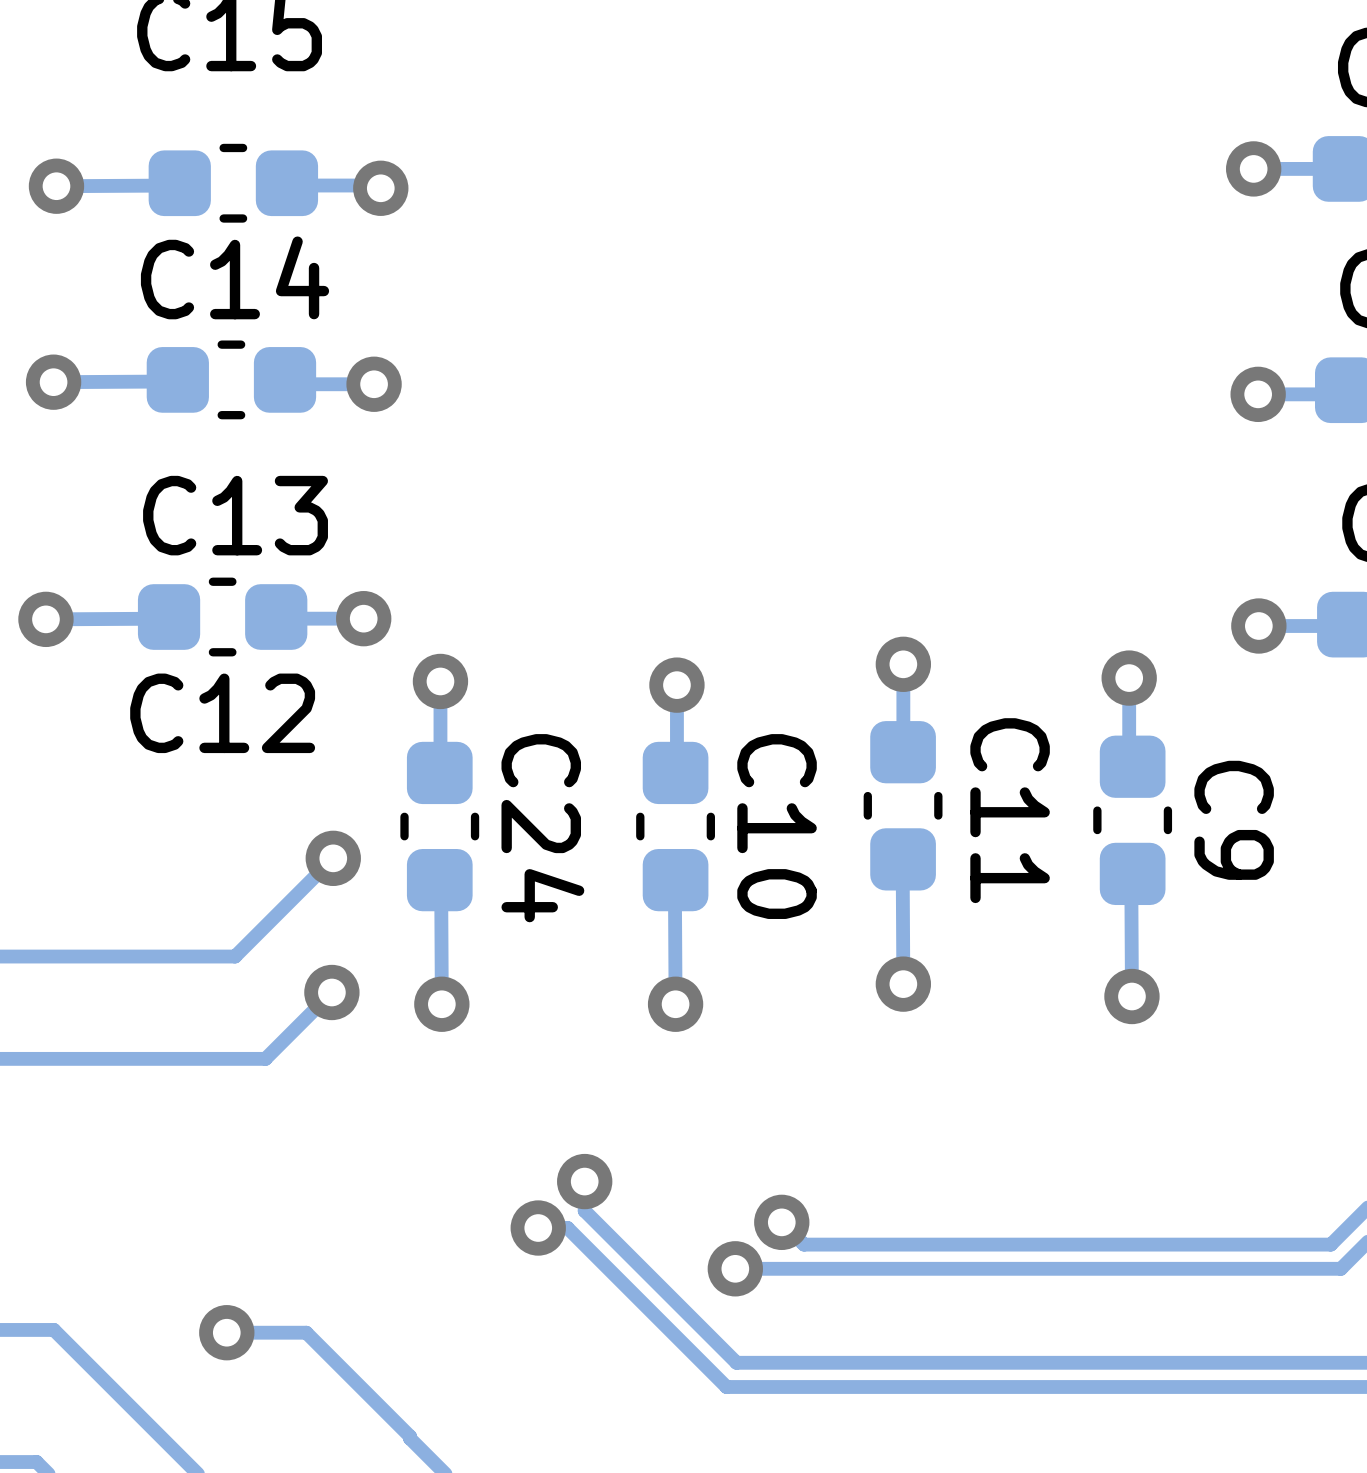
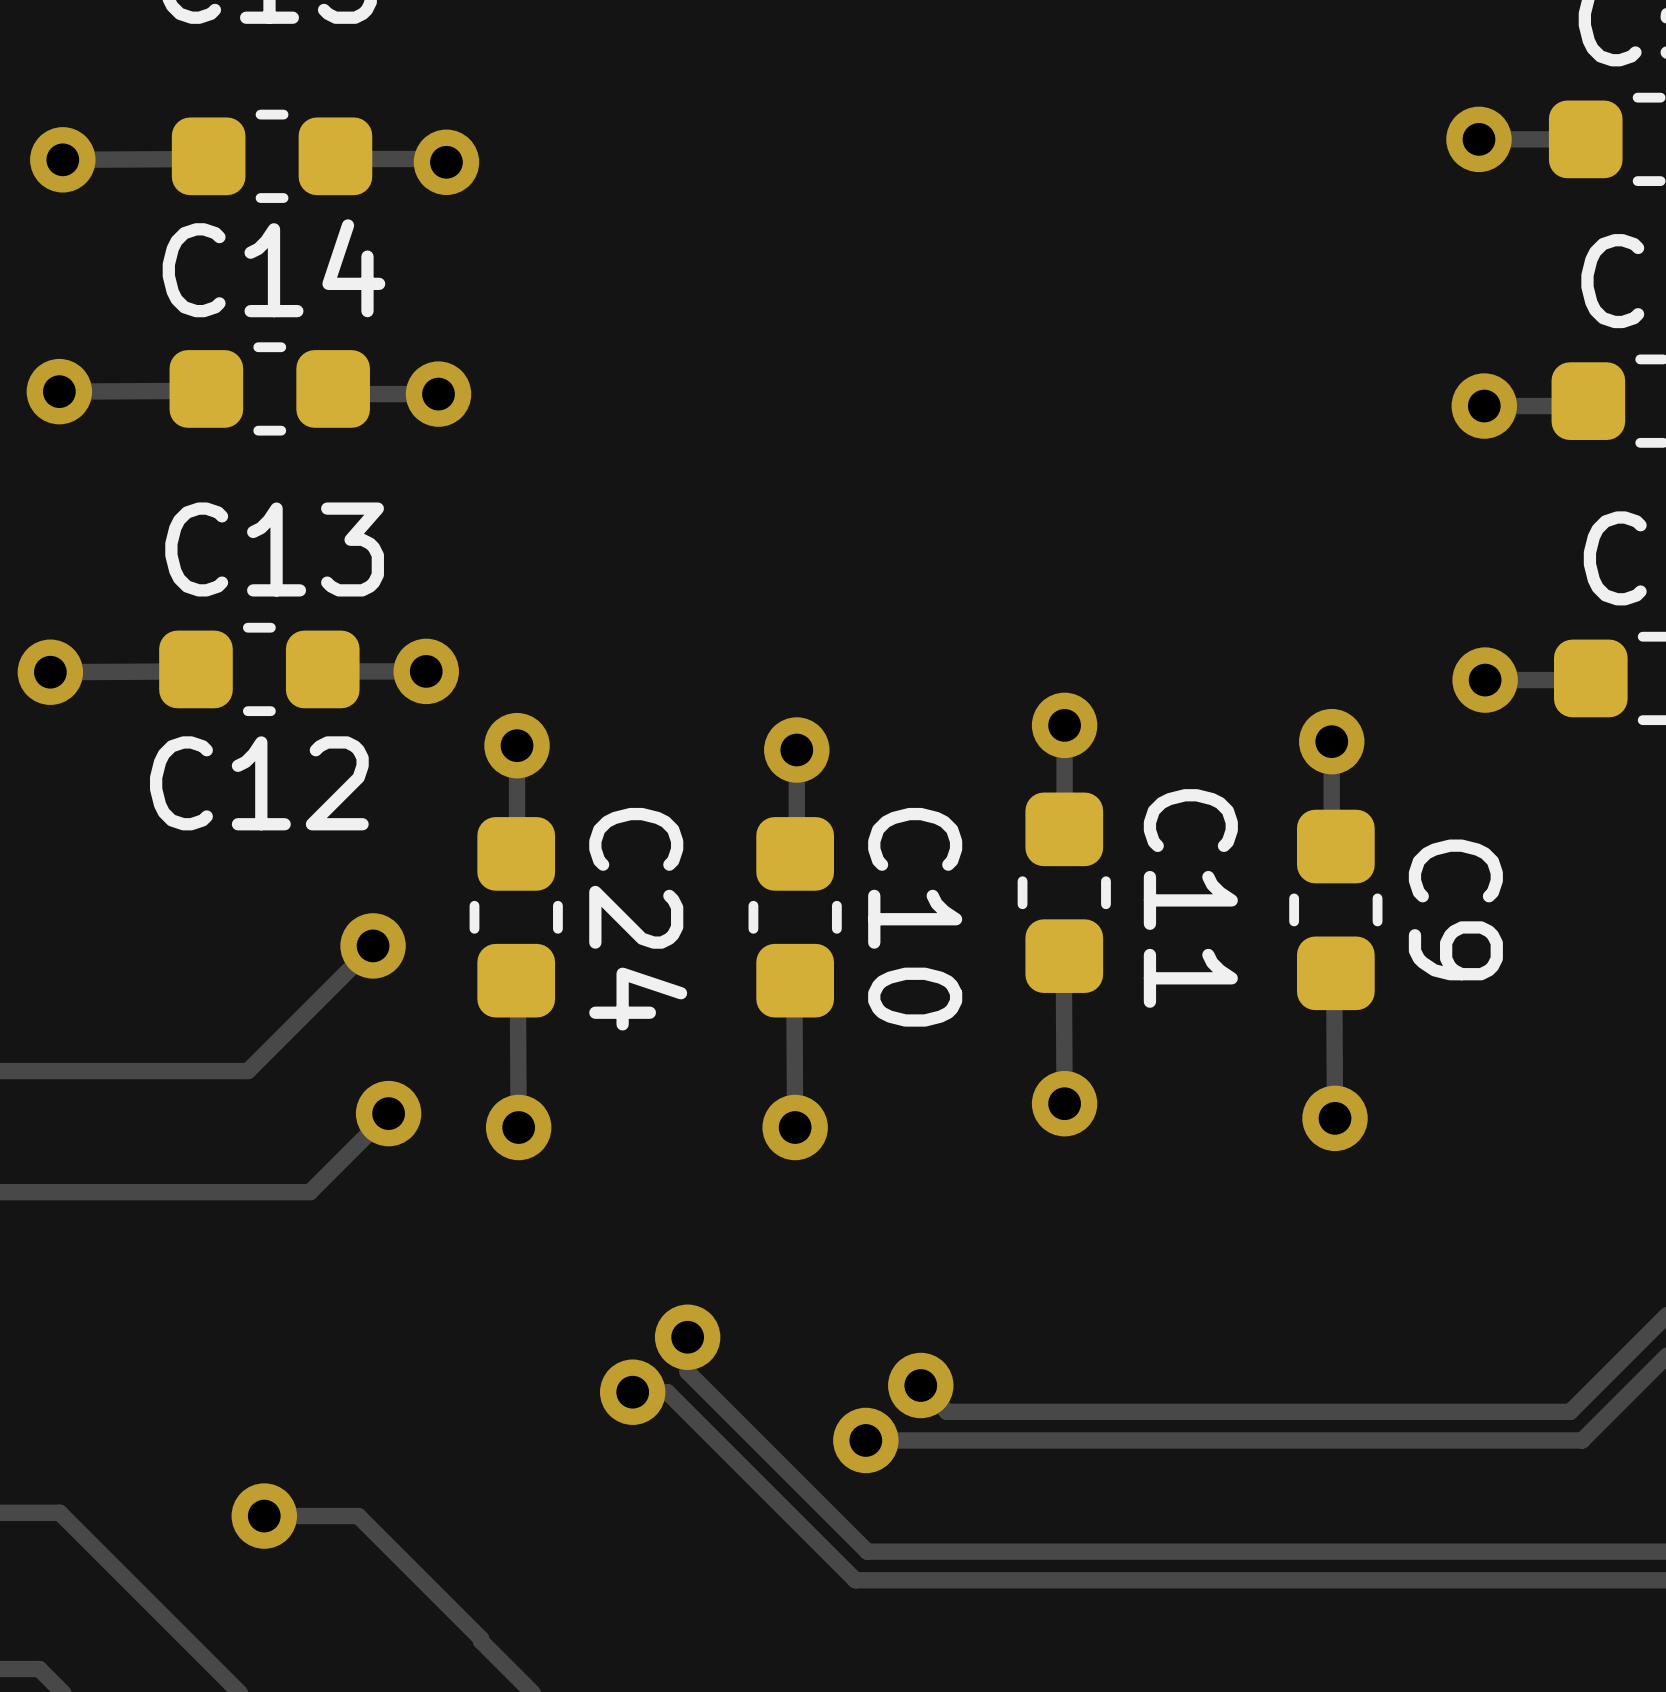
track: (333, 858) (235, 956) (212, 956) -> (373, 945) (247, 1071)
via position: (333, 858) -> (373, 945)

